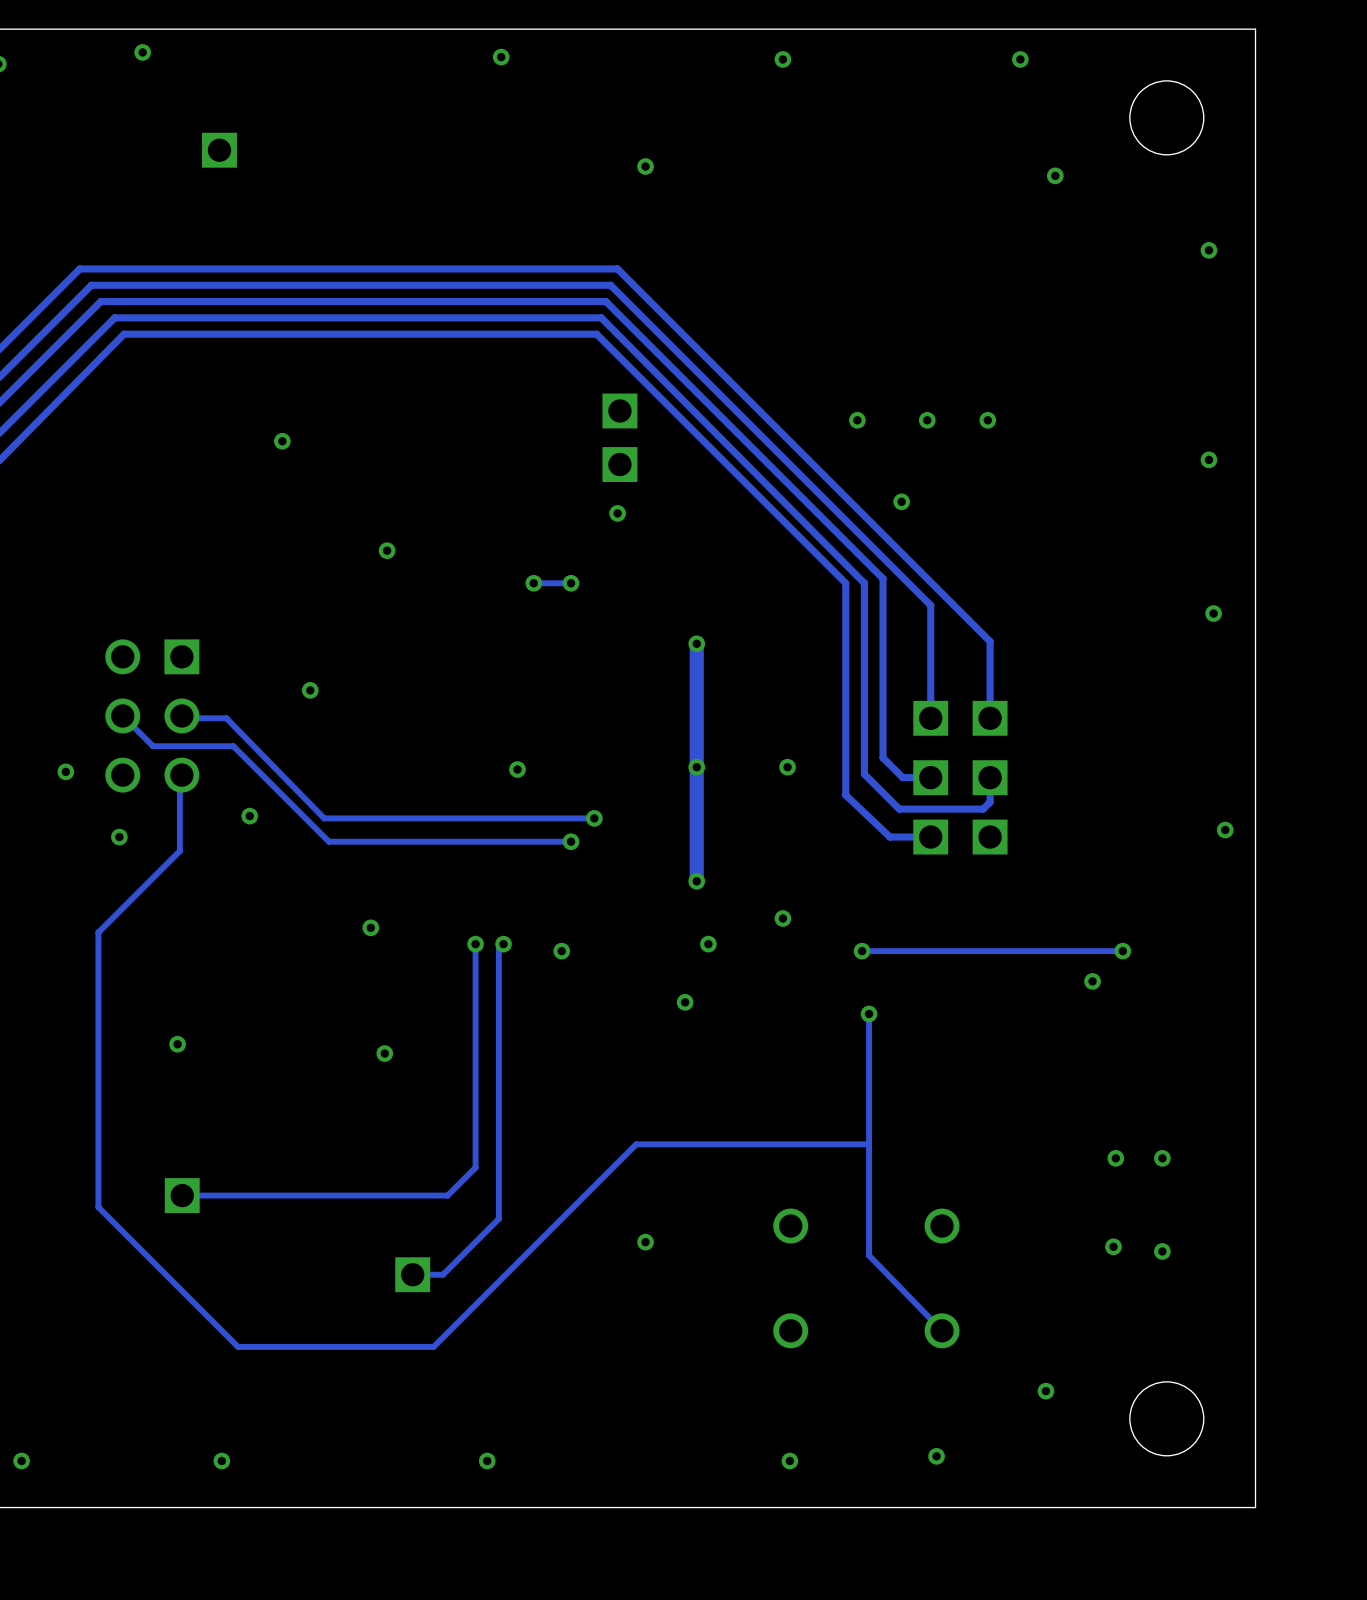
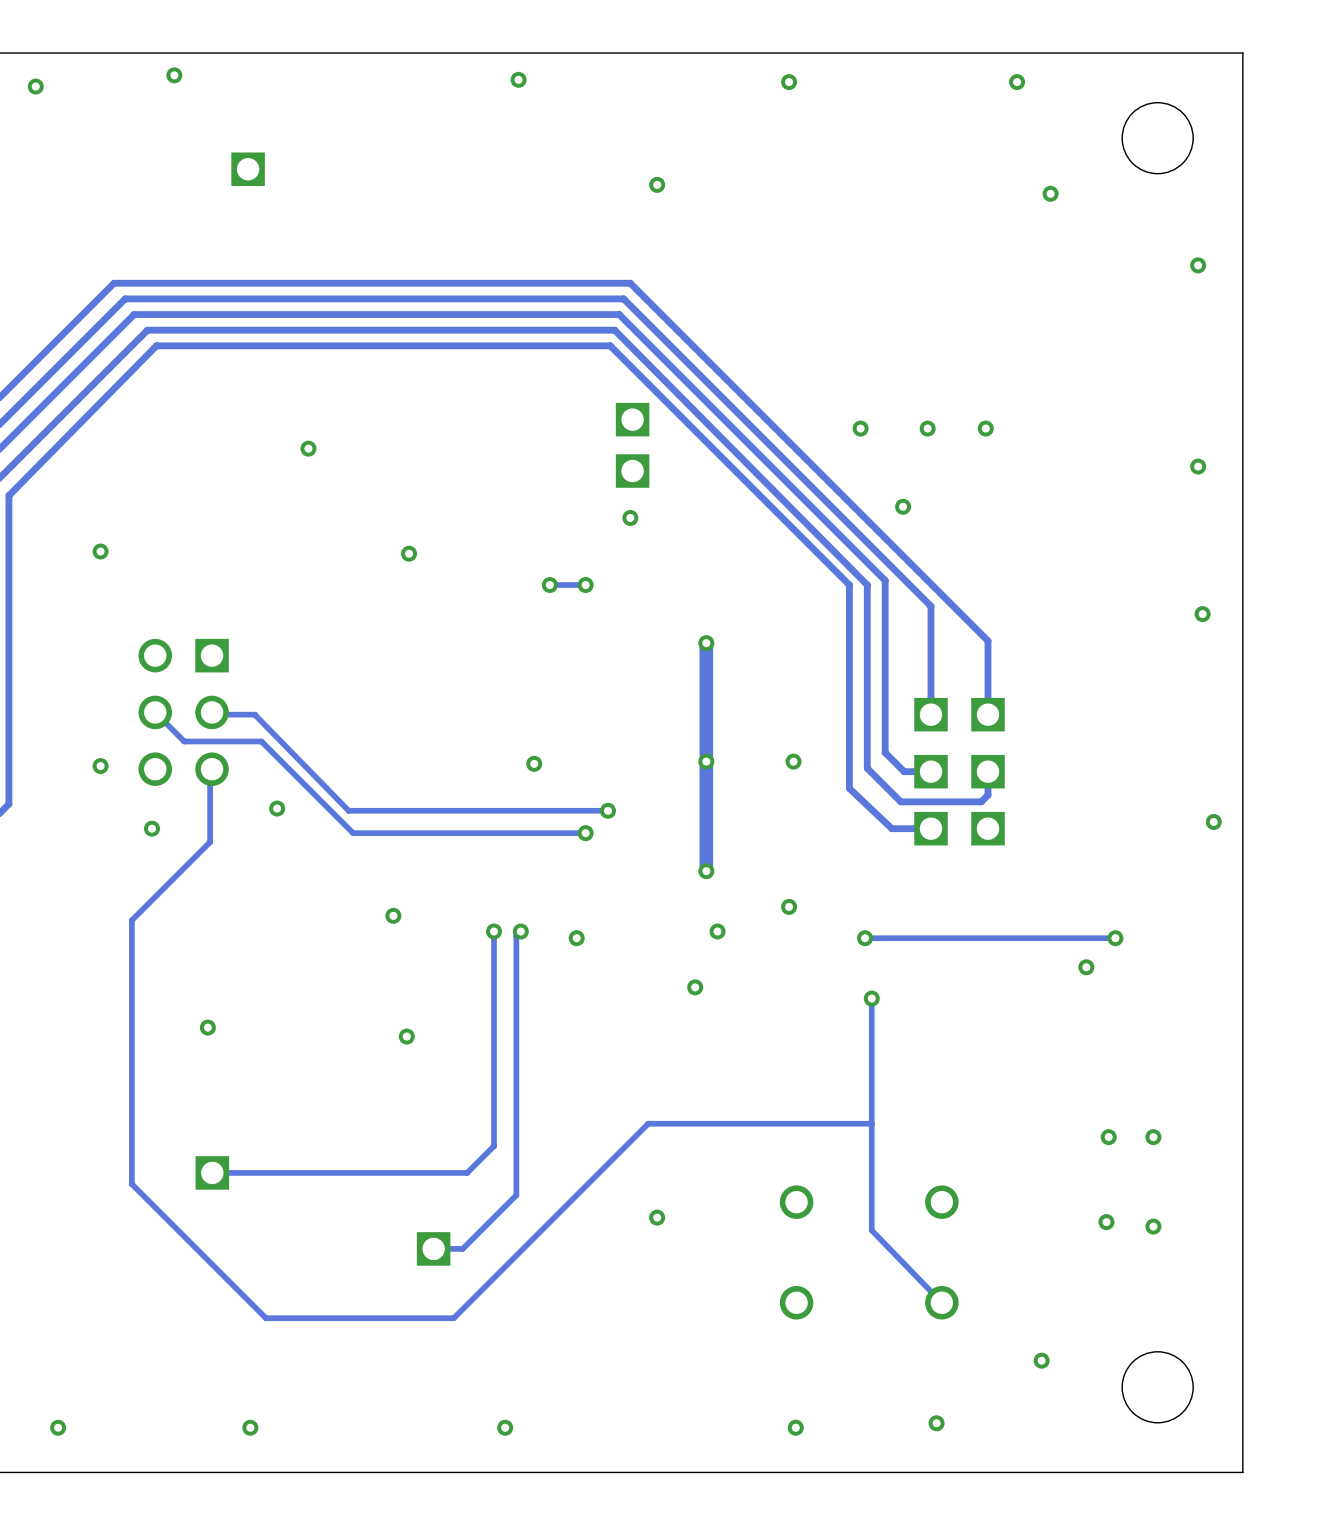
via: none -> (100, 551)
via: (310, 690) -> none

